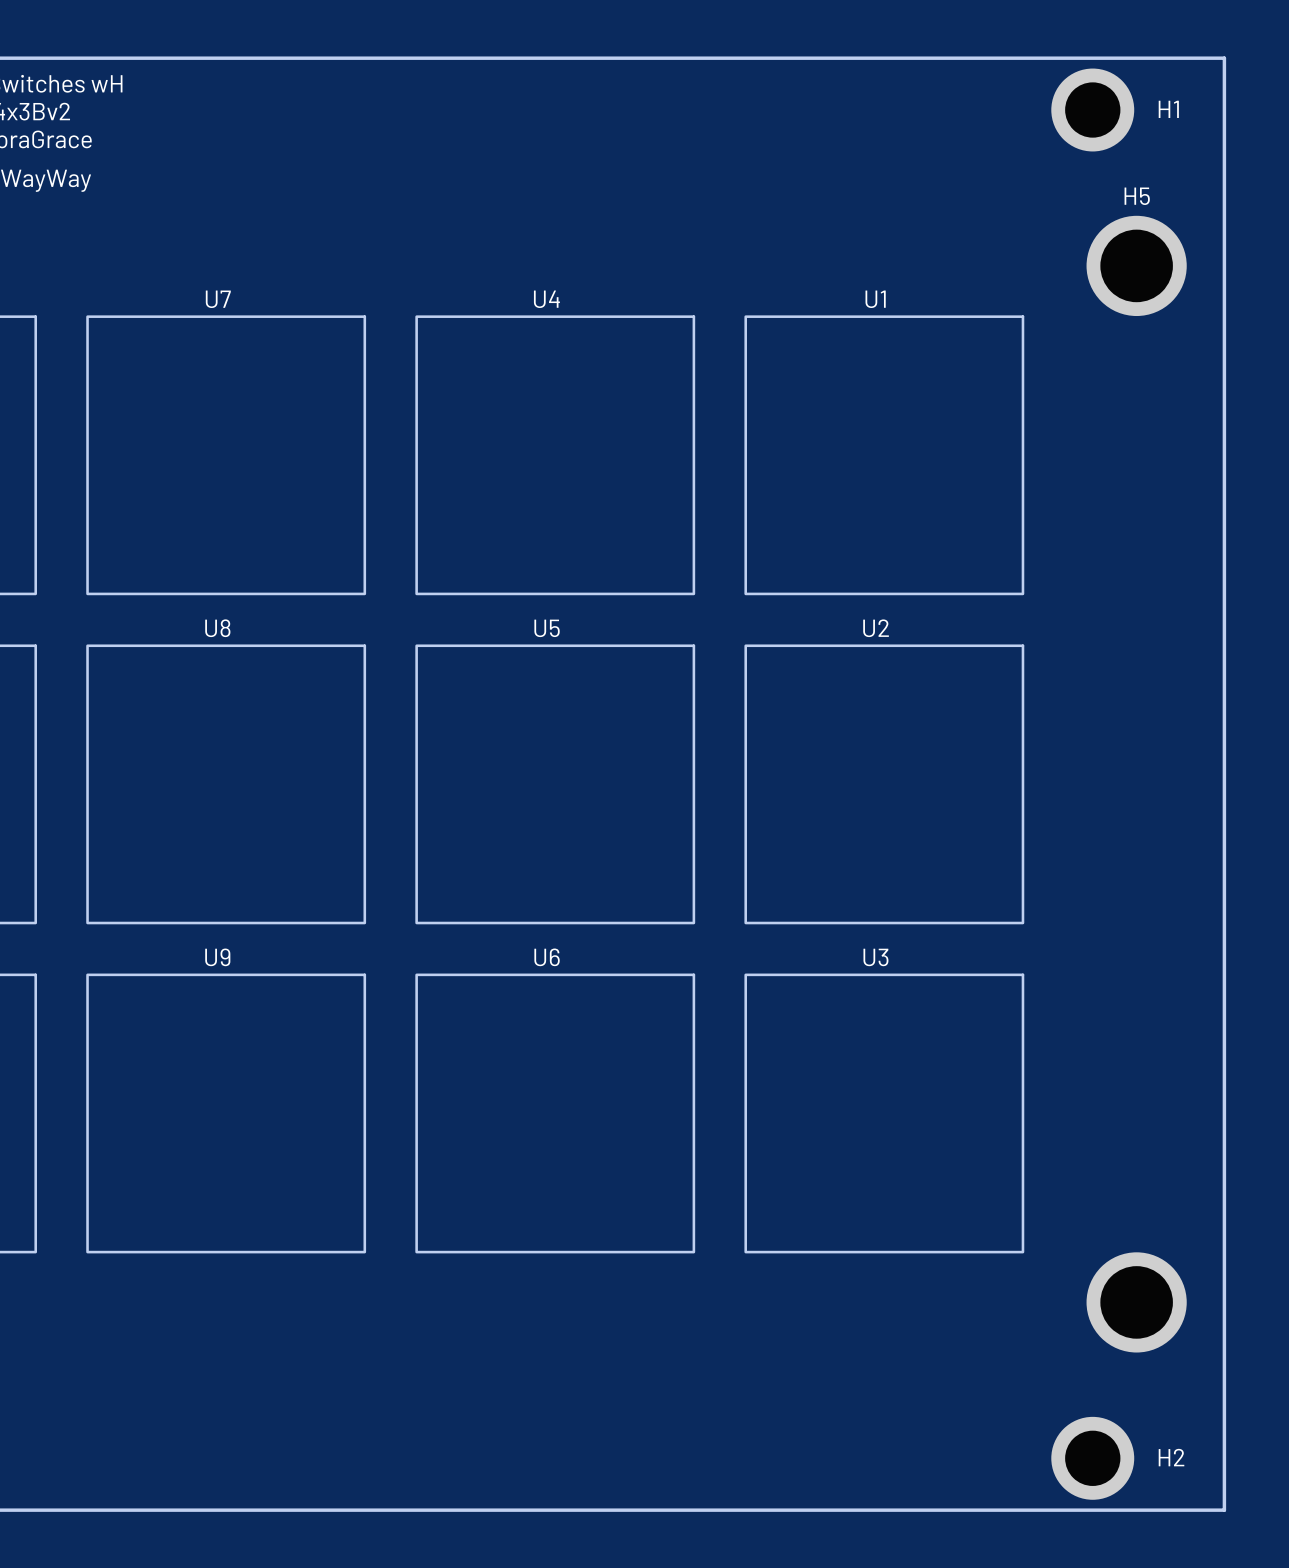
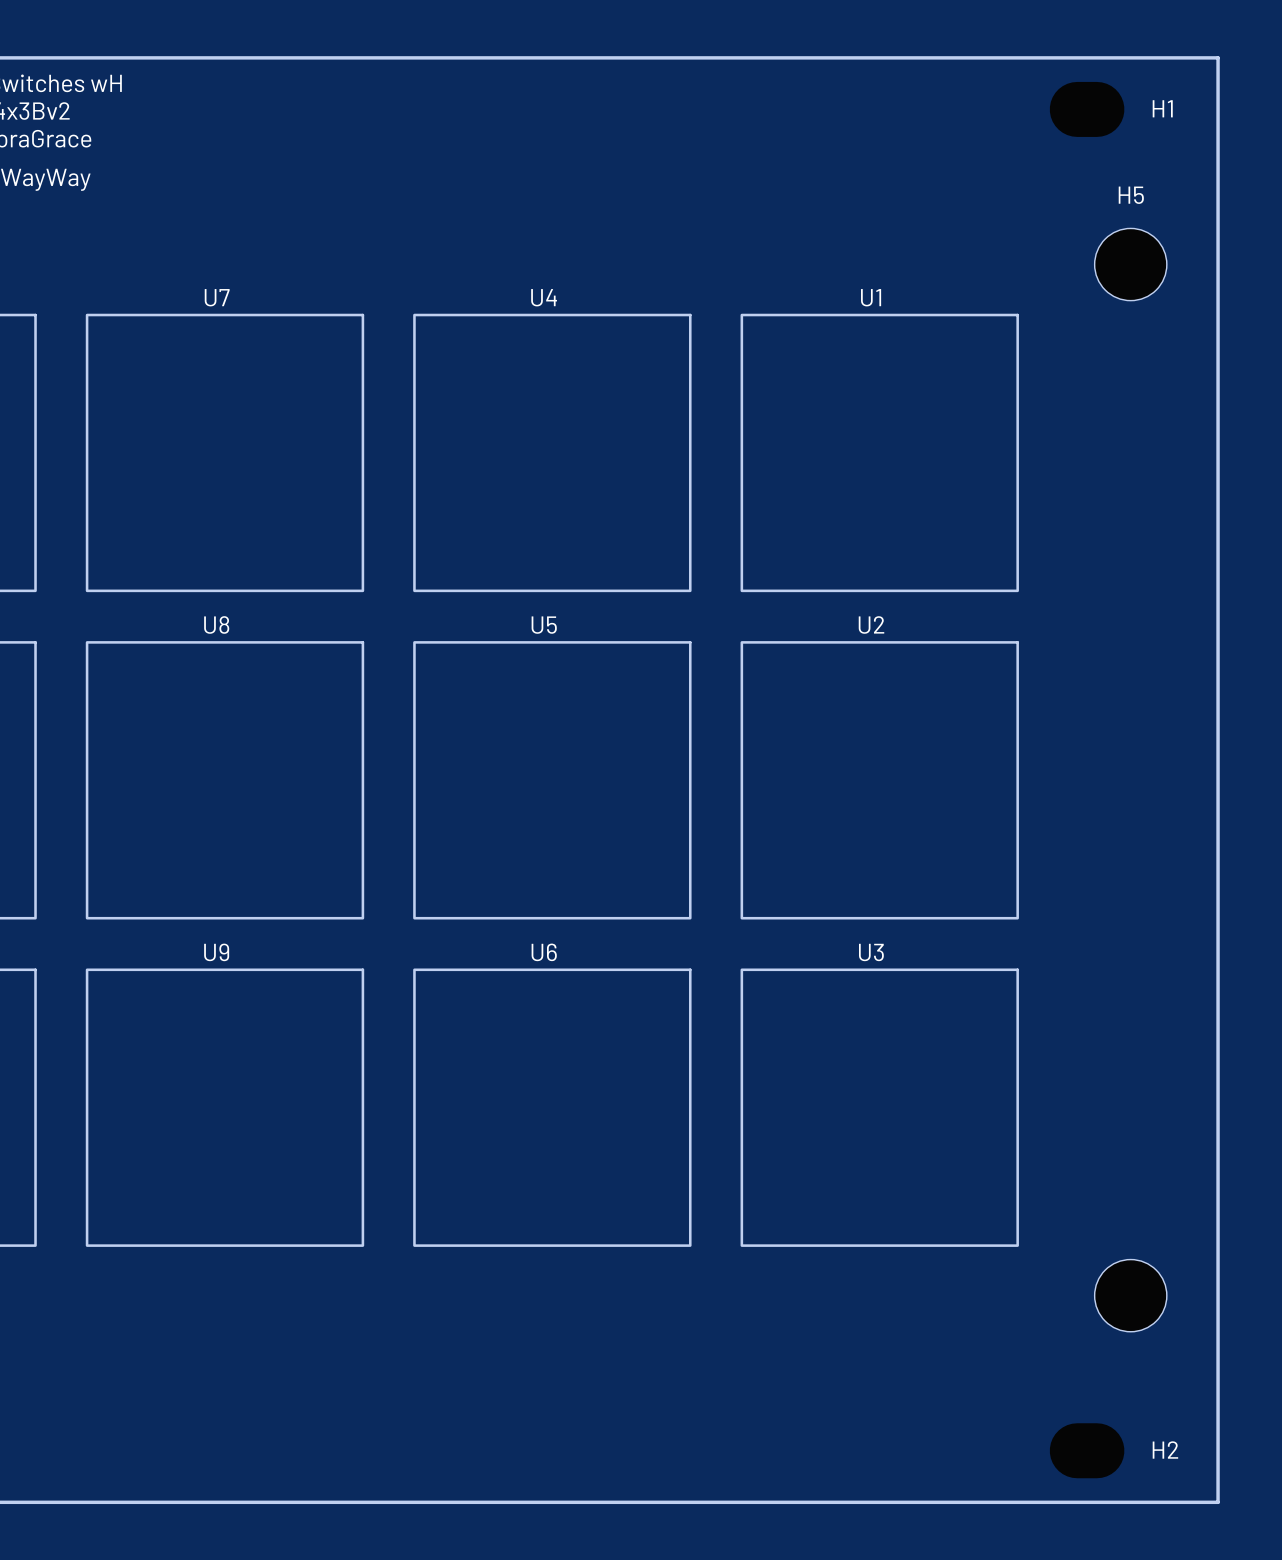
H1 footprint: [1051, 68, 1135, 152] -> [1049, 81, 1125, 137]
H5 footprint: [1086, 215, 1187, 1353] -> [1094, 228, 1167, 1332]
H2 footprint: [1051, 1416, 1135, 1500] -> [1049, 1423, 1125, 1479]

